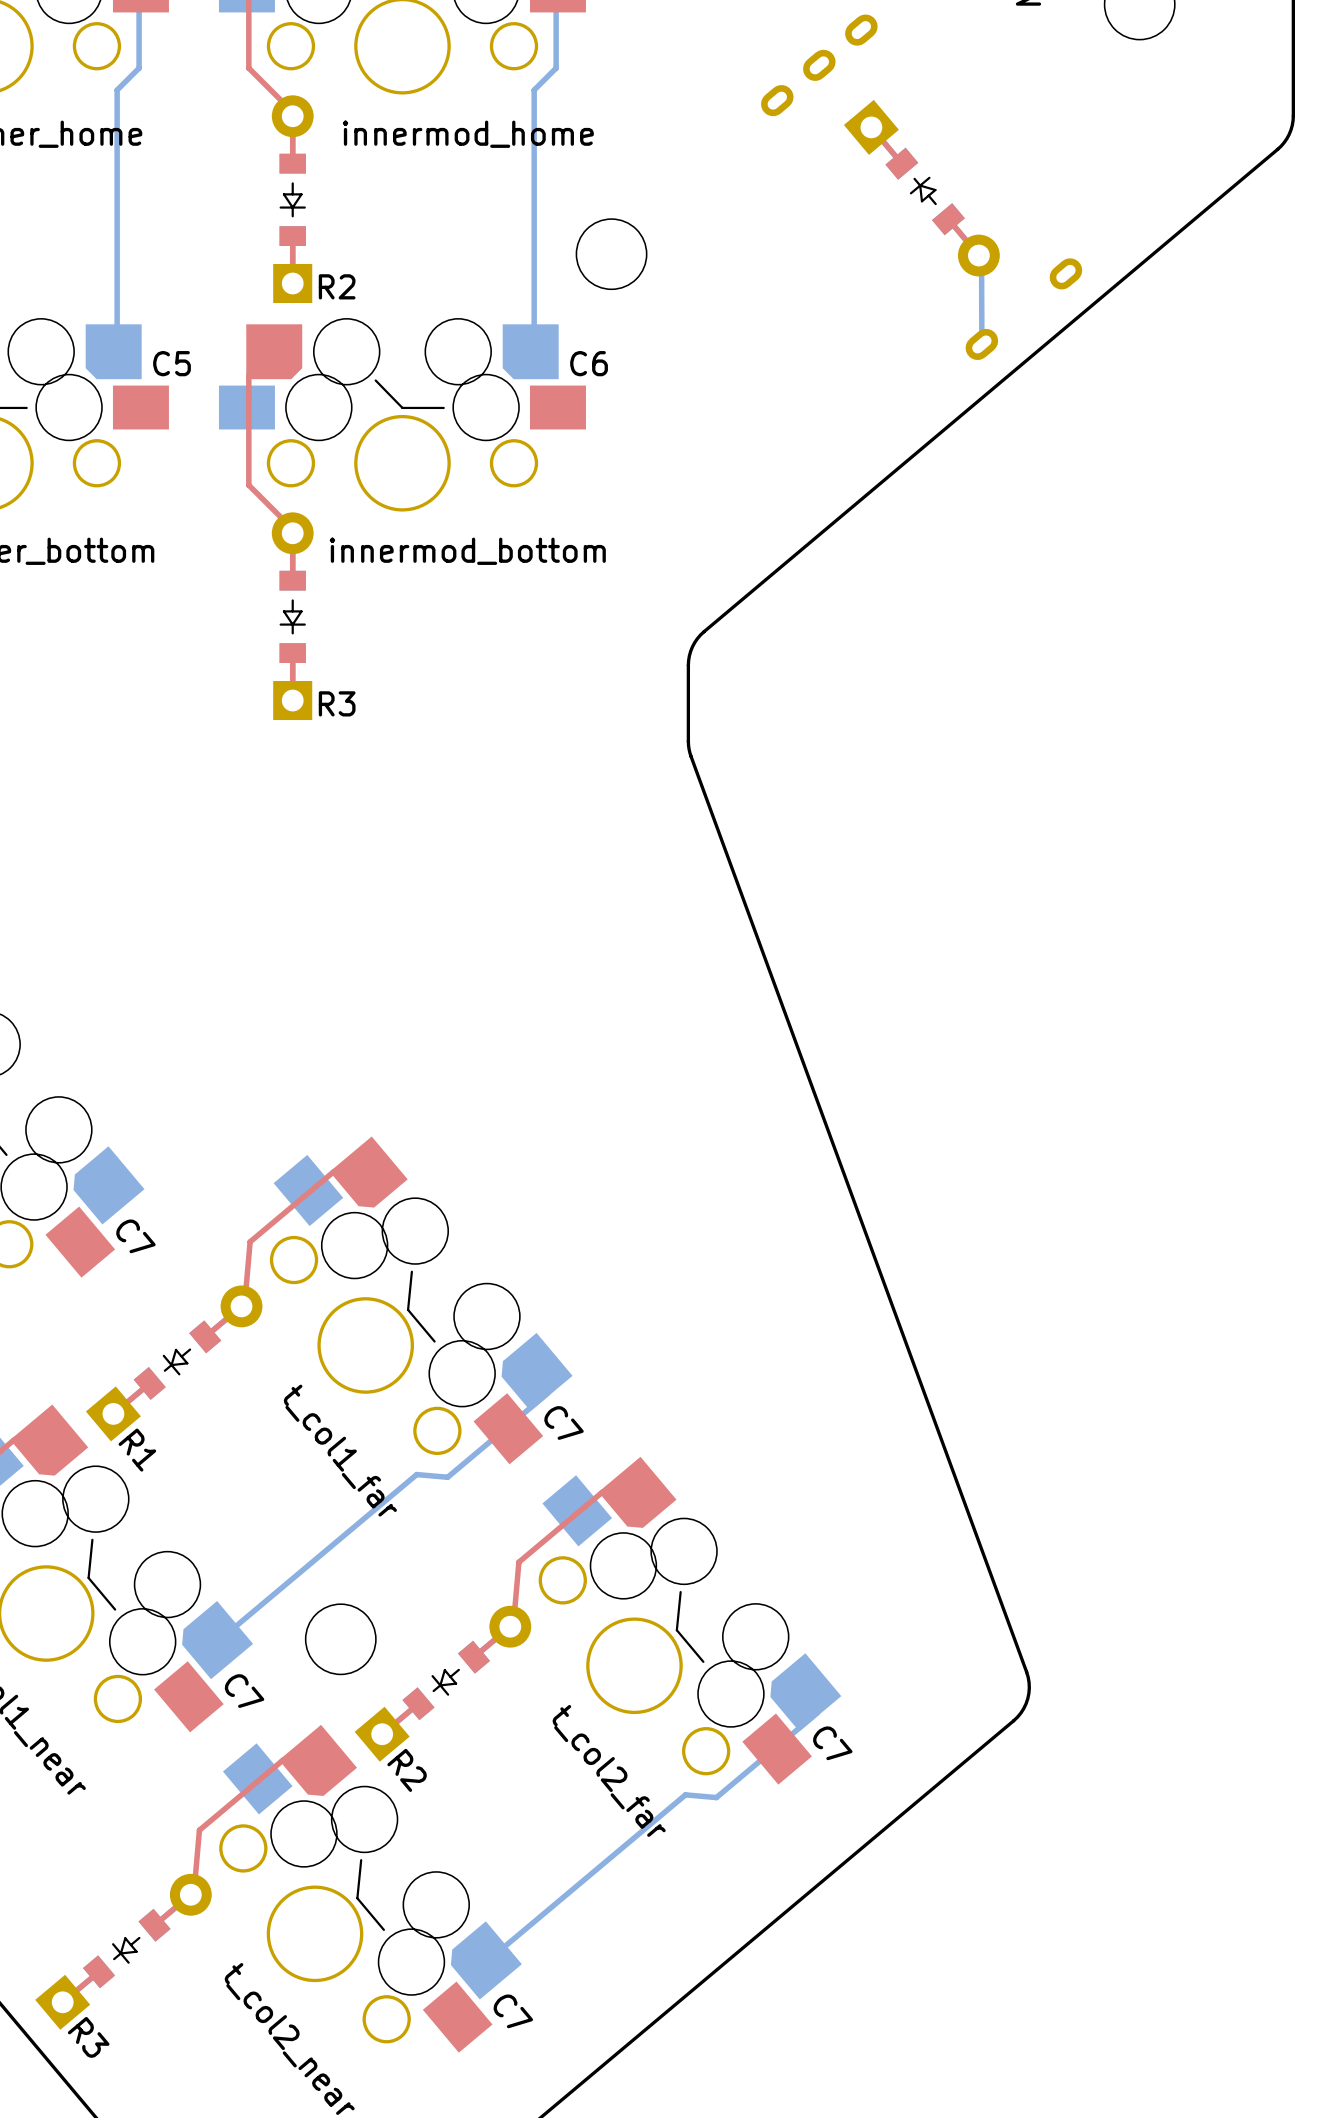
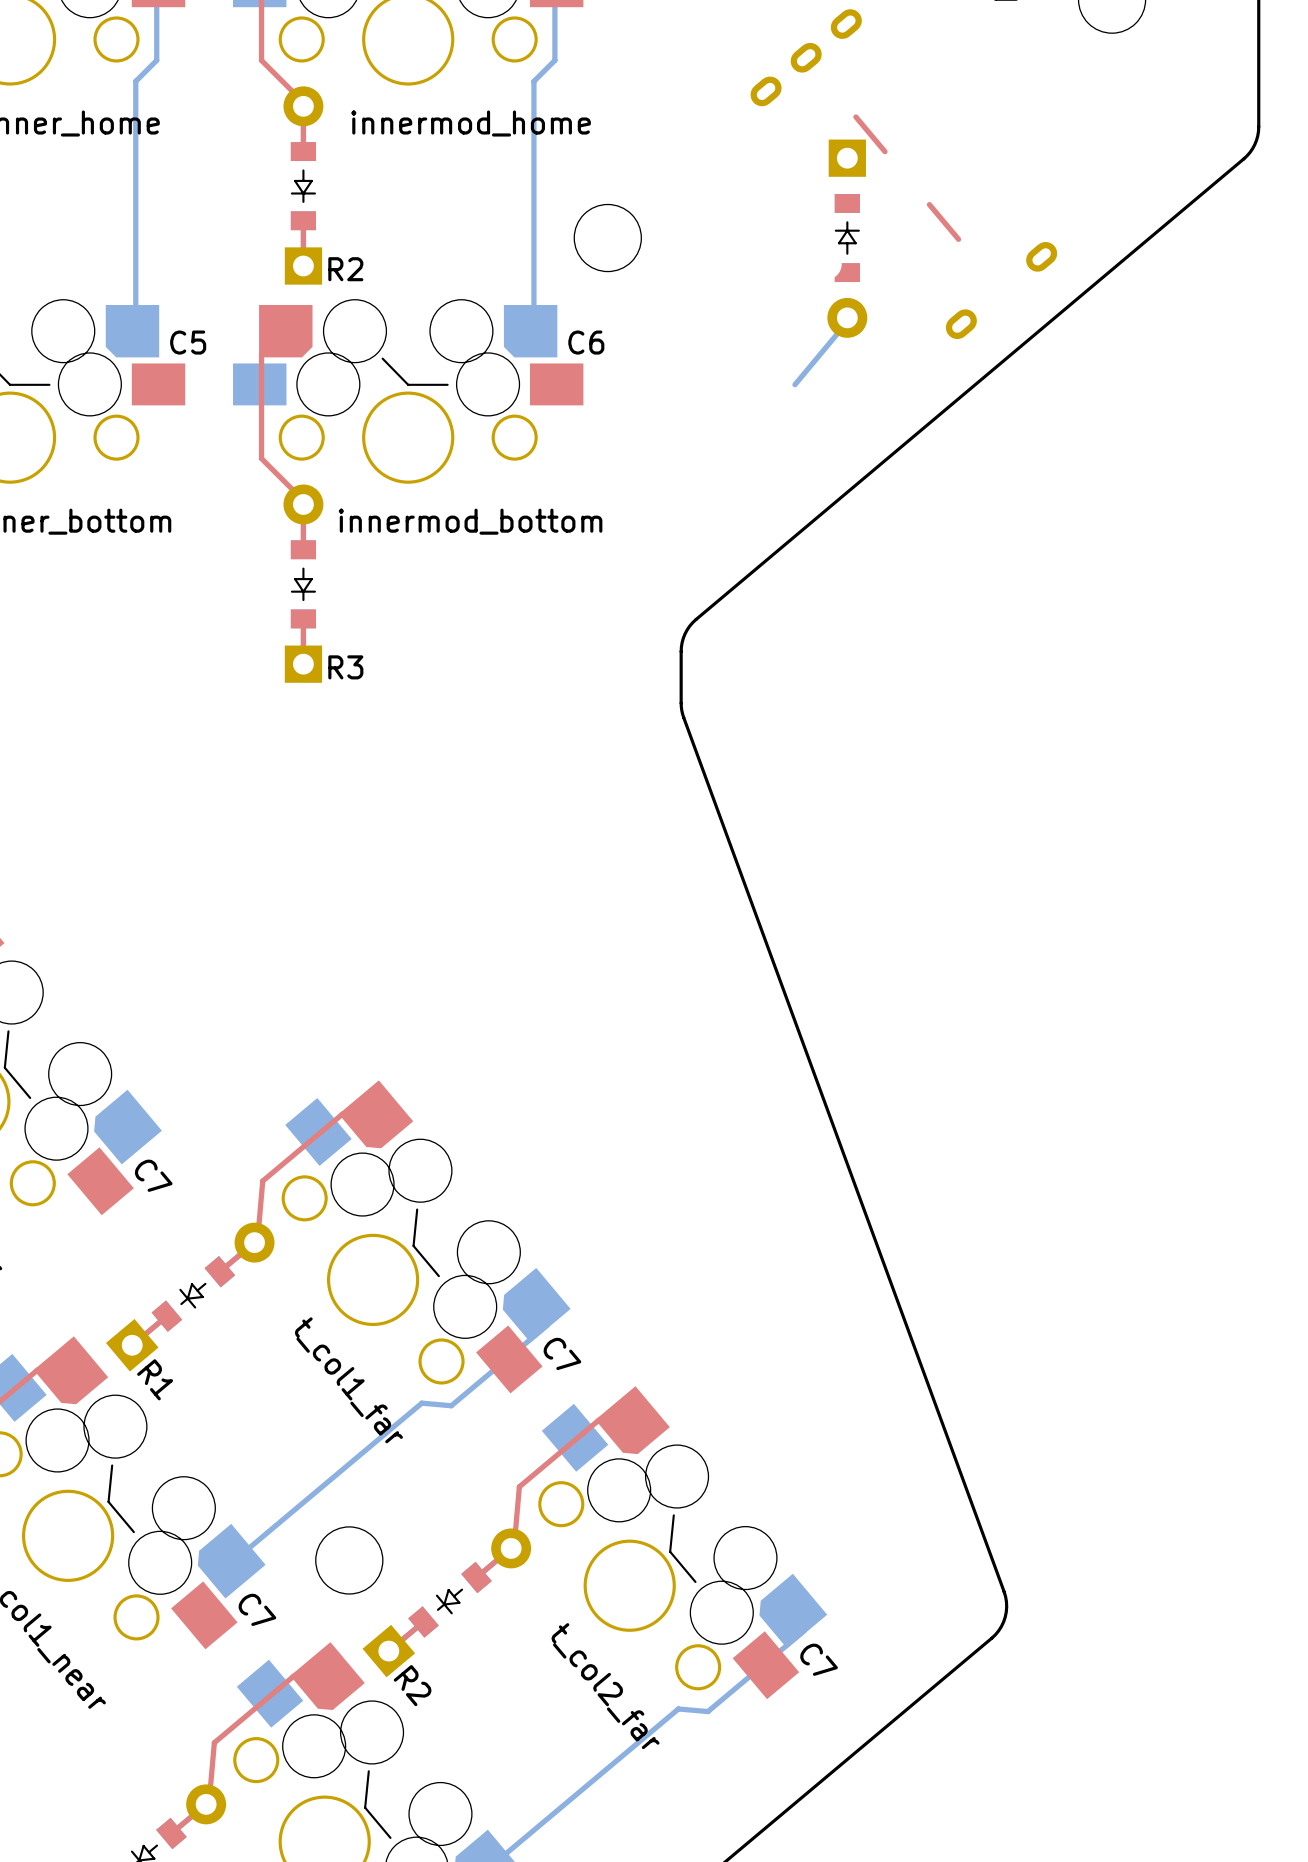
board edge: (1293, 115) (1289, 134) (1277, 149) (700, 635) (694, 642) (689, 655) (688, 687) -> (1258, 105) (1257, 135) (1247, 155) (696, 619) (685, 633) (681, 651)
part: (921, 188) -> none
part: none -> (847, 238)
bottom track: (981, 258) (981, 344) -> none
bottom track: none -> (847, 321) (794, 384)

